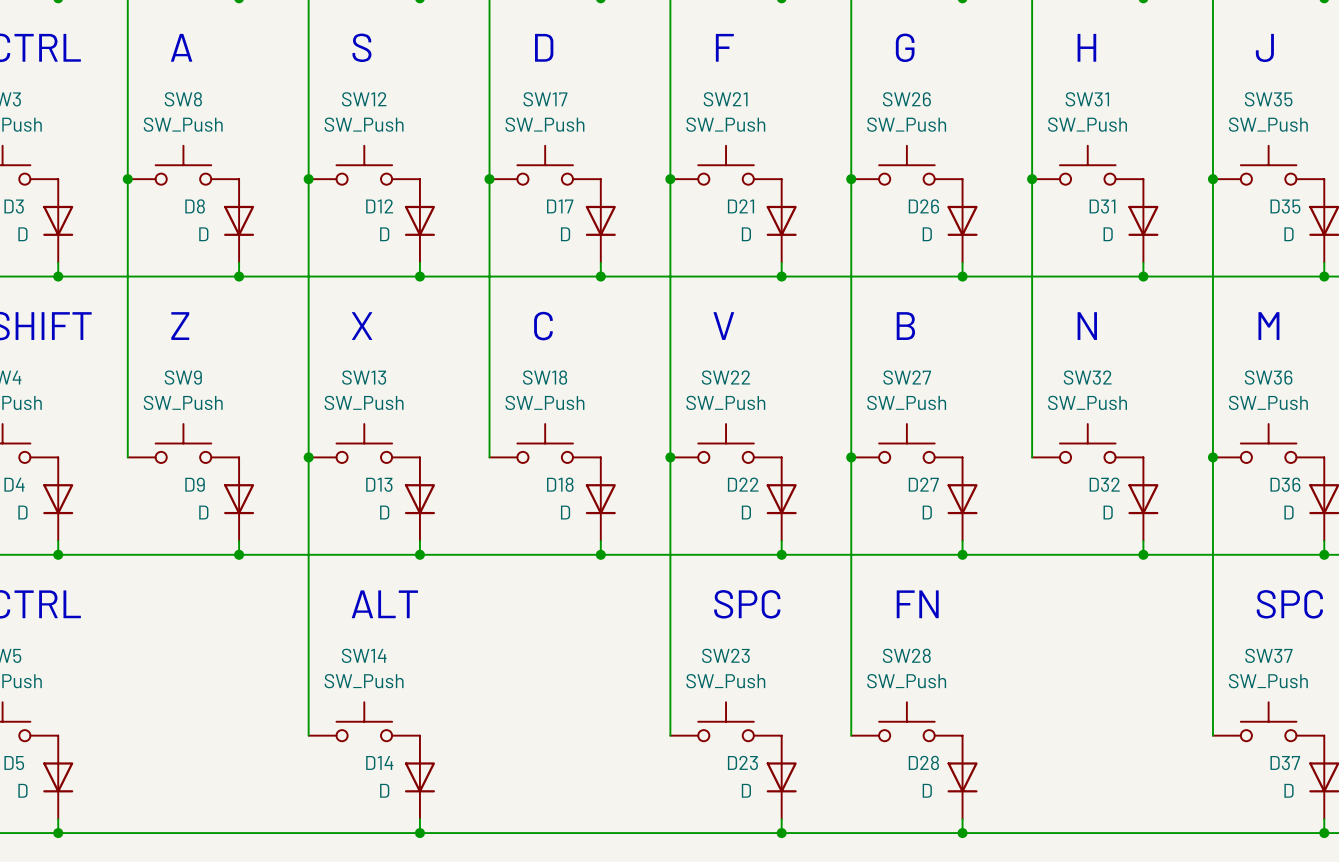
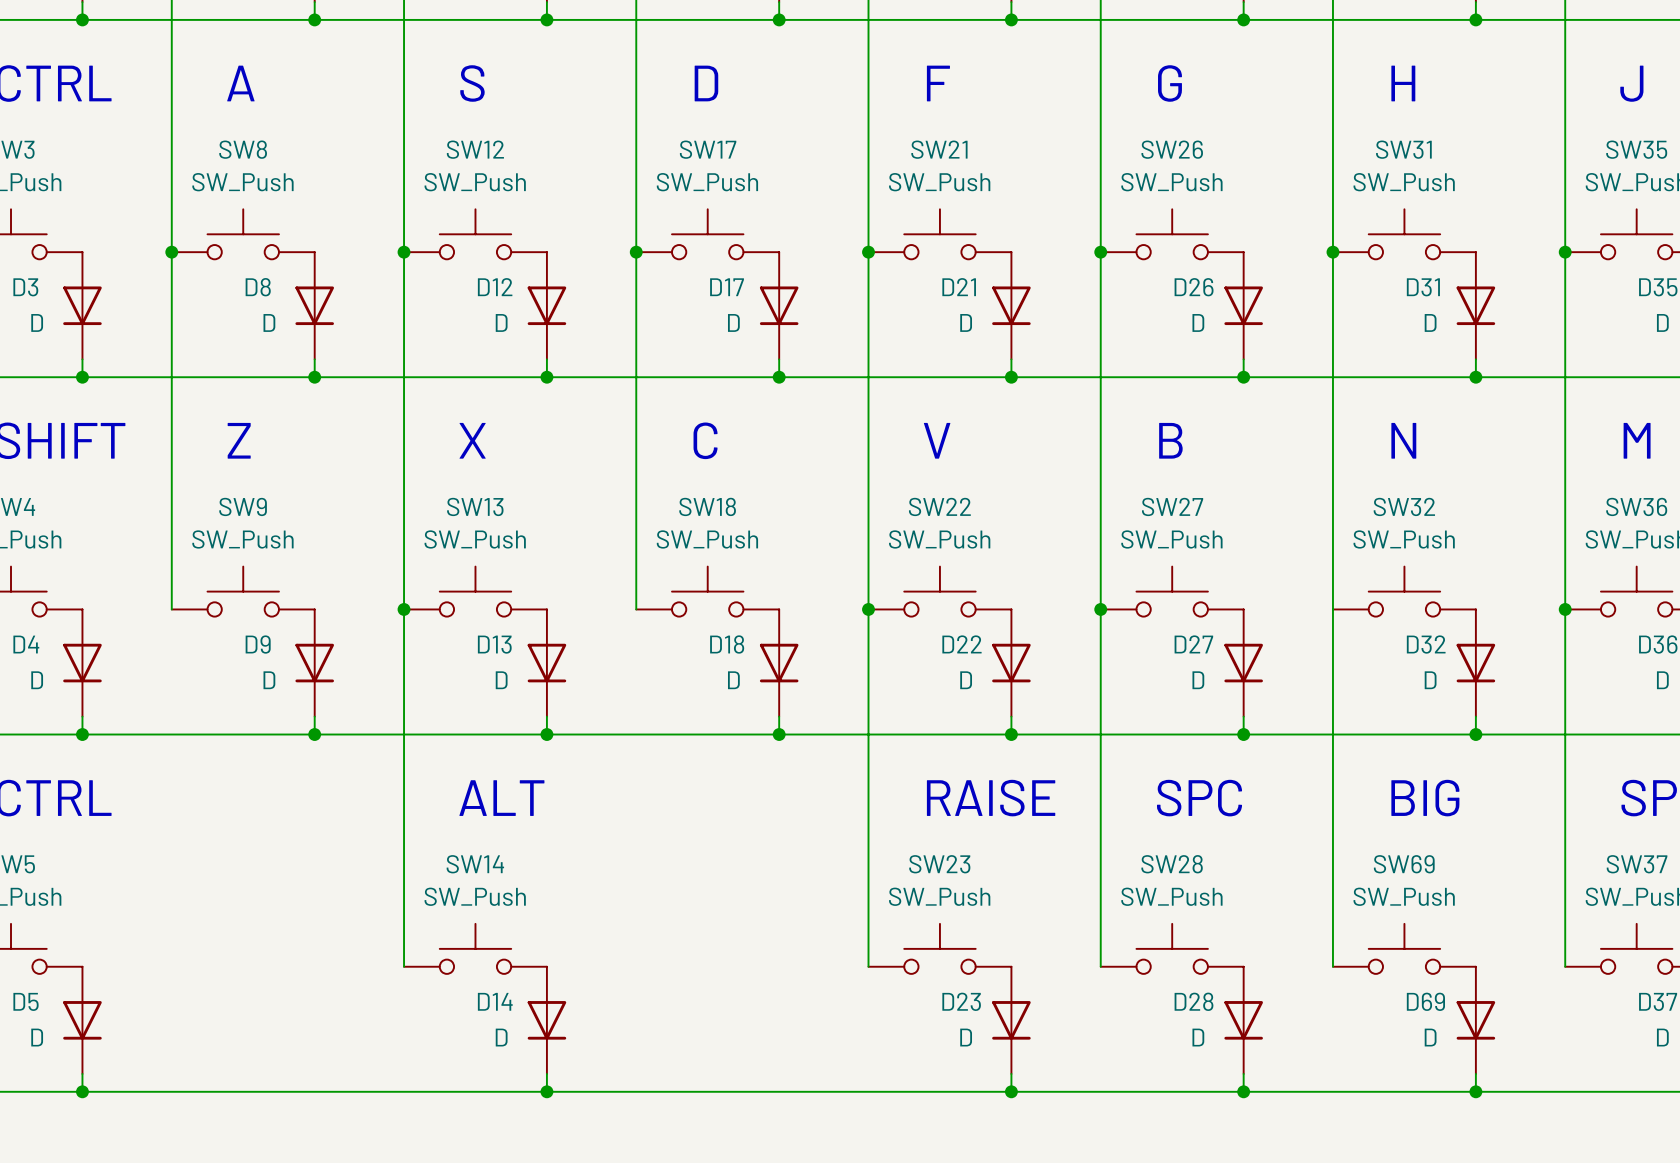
wire: none -> (1332, 609) (1332, 966)
text: SPC (747, 604) -> RAISE (991, 798)
text: FN (917, 604) -> SPC (1199, 798)
text: none -> BIG (1425, 798)
SW69: none -> SW_Push (1404, 948)
D69: none -> D (1475, 1020)
wire: none -> (1475, 1073) (1475, 1091)
junction: none -> (1475, 1091)

